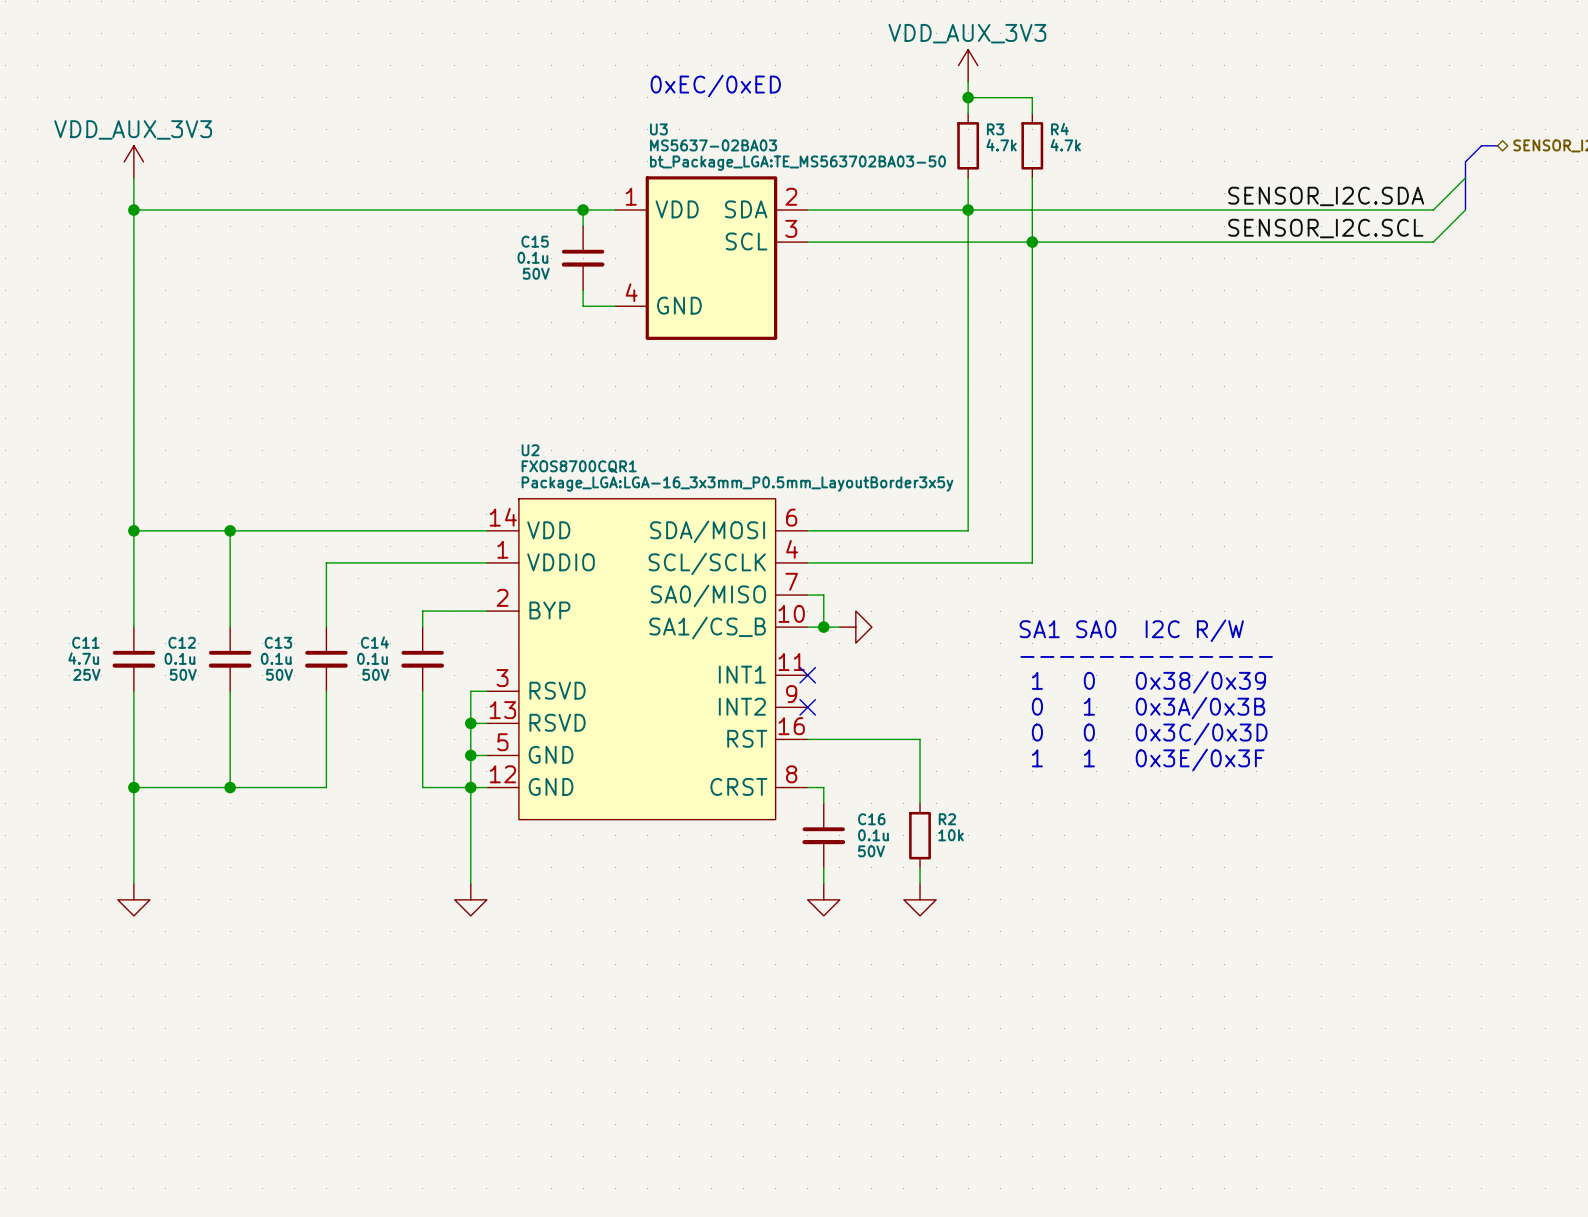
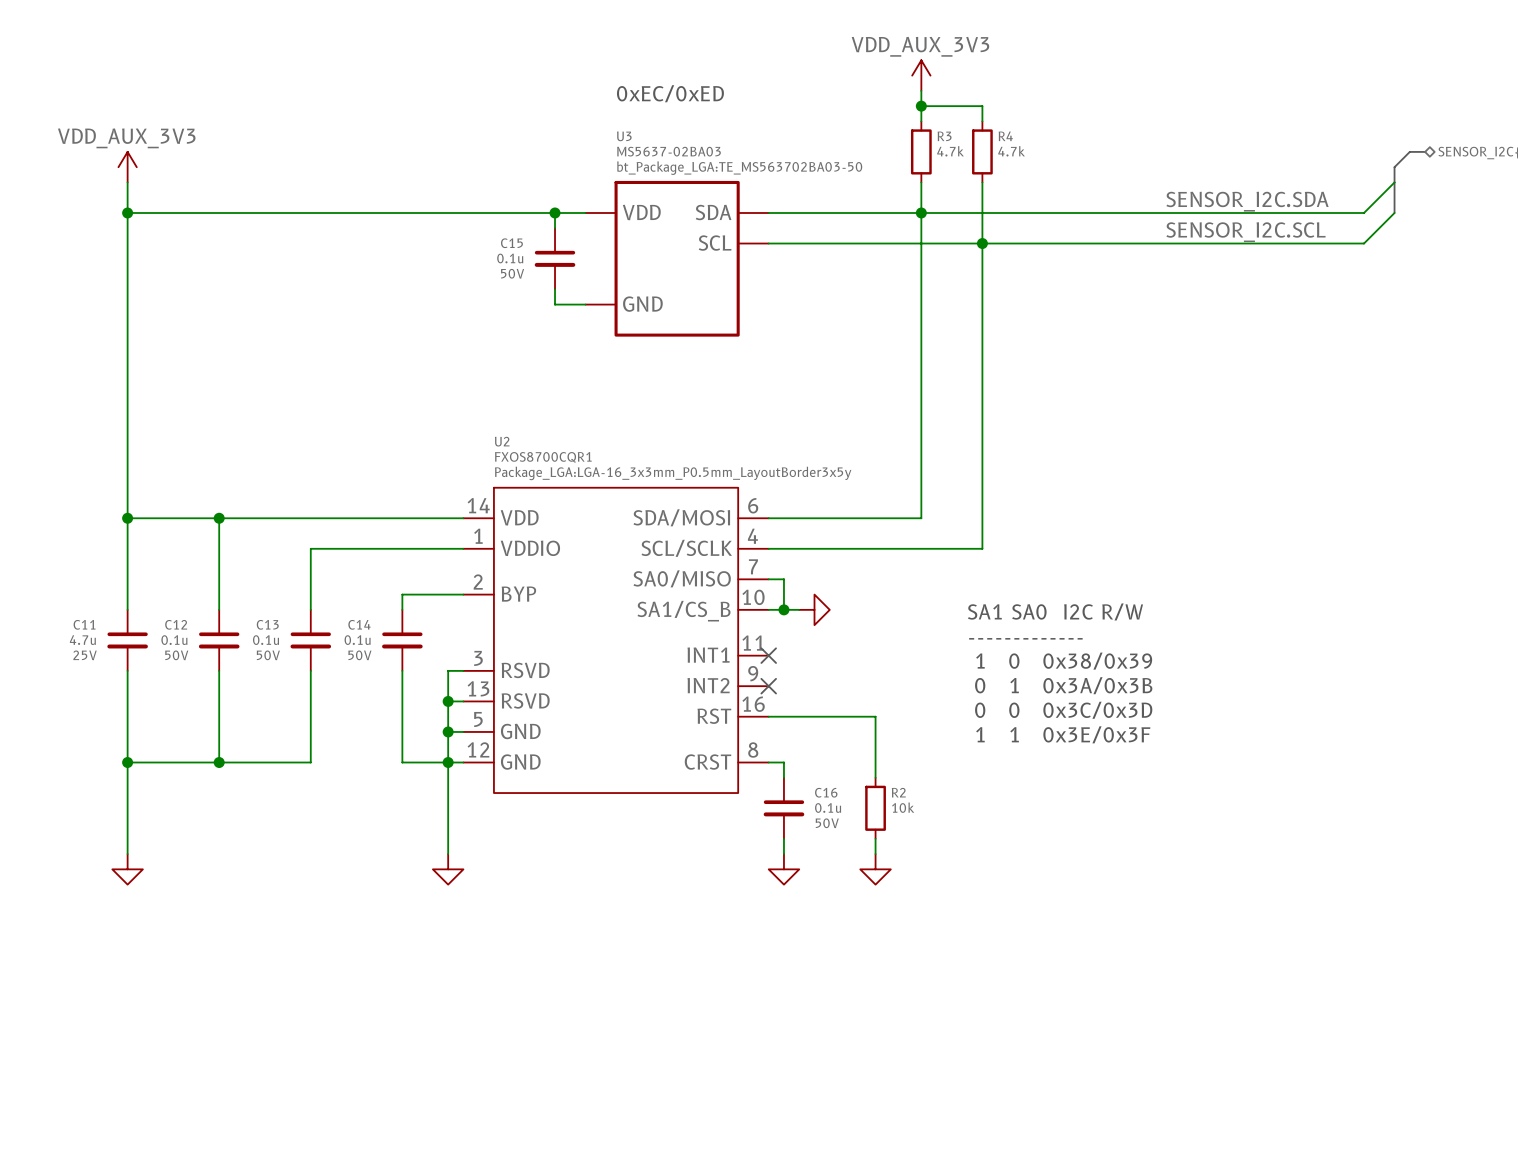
U3 pin number: 1 (631, 196) -> none
U3 pin number: 2 (791, 196) -> none
U3 pin number: 3 (791, 228) -> none
U3 pin number: 4 (631, 292) -> none

